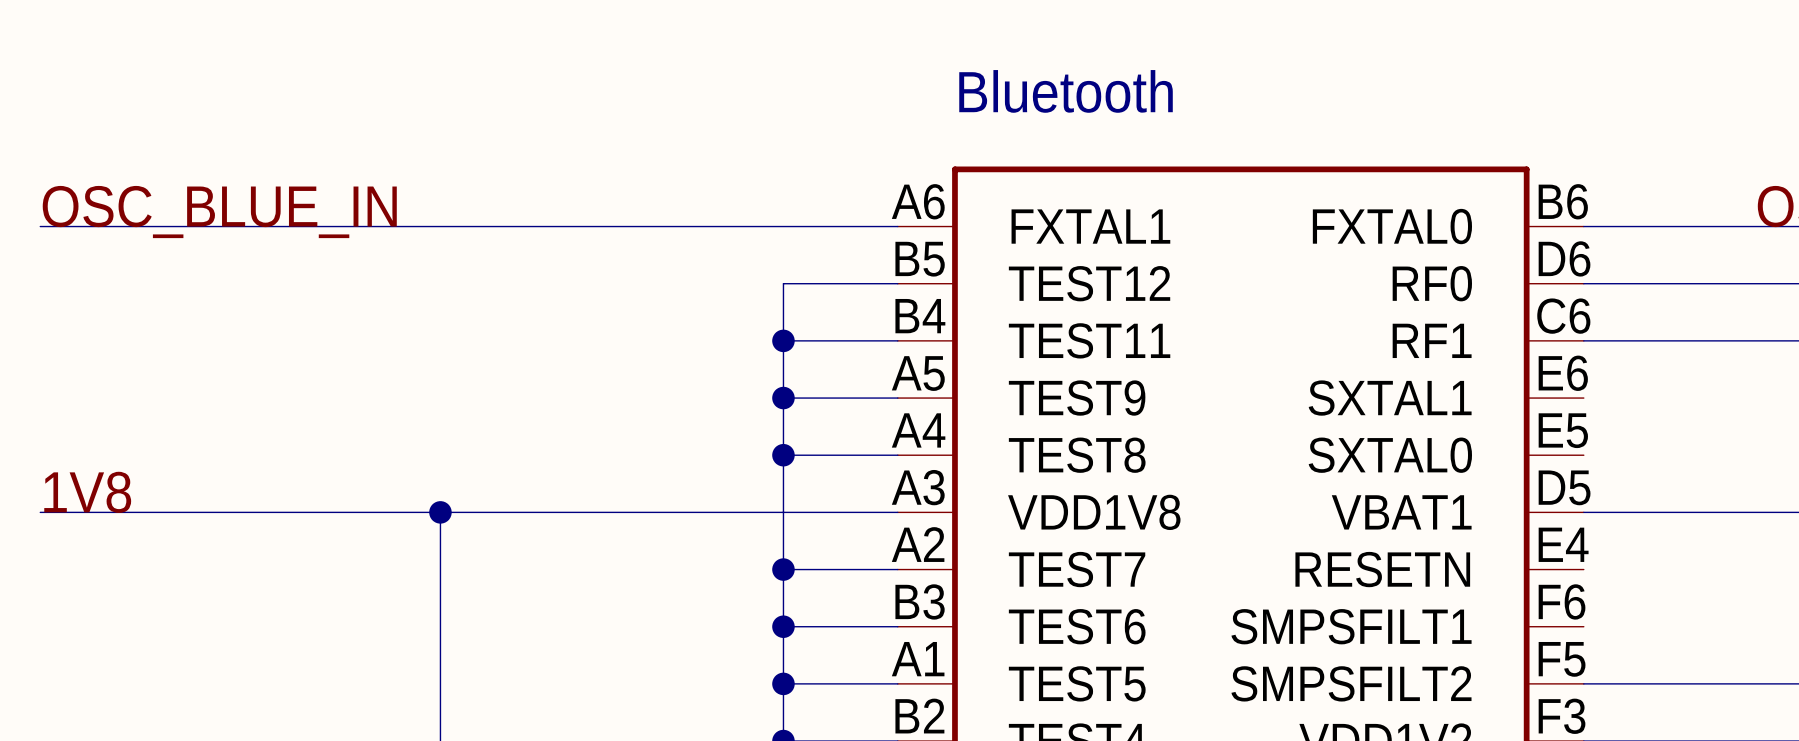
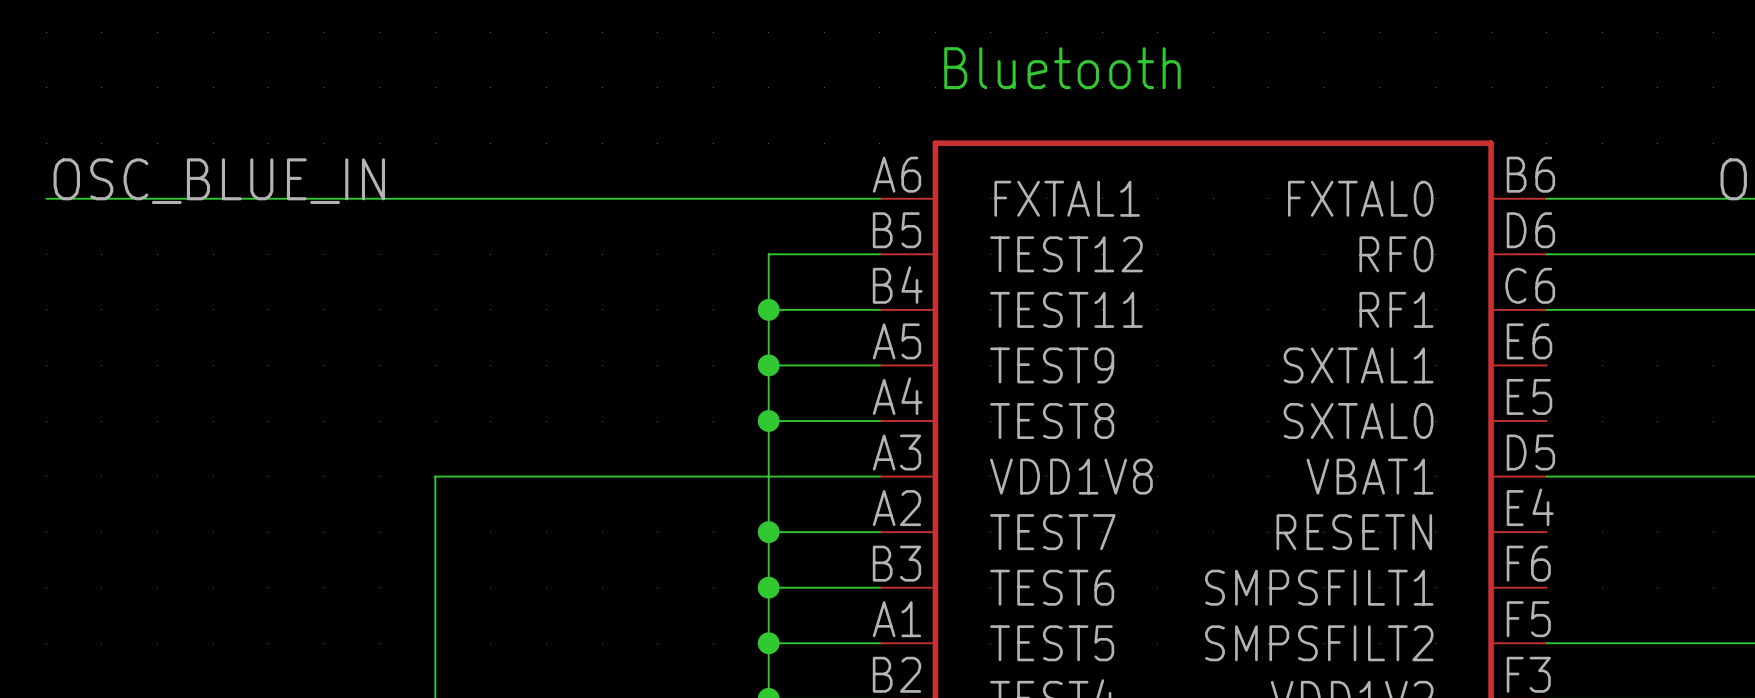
label: 1V8 (87, 492) -> none
wire: (40, 512) (440, 512) -> none
junction: (440, 512) -> none

